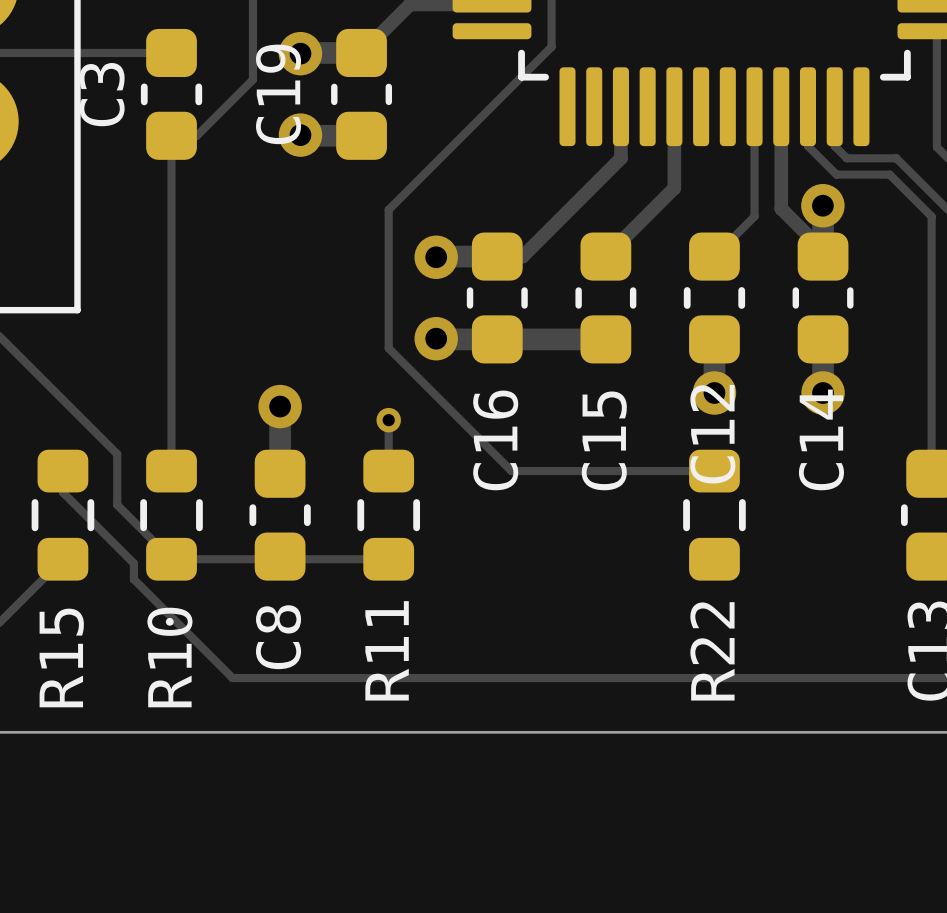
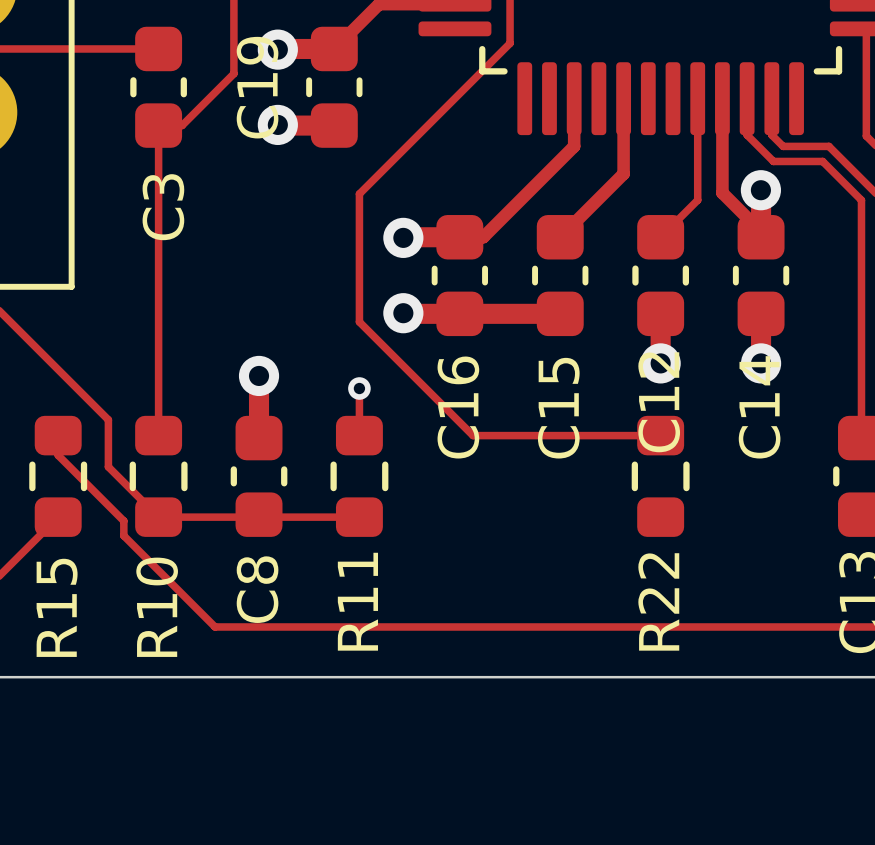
C3 name position: C3 (102, 94) -> C3 (163, 207)

